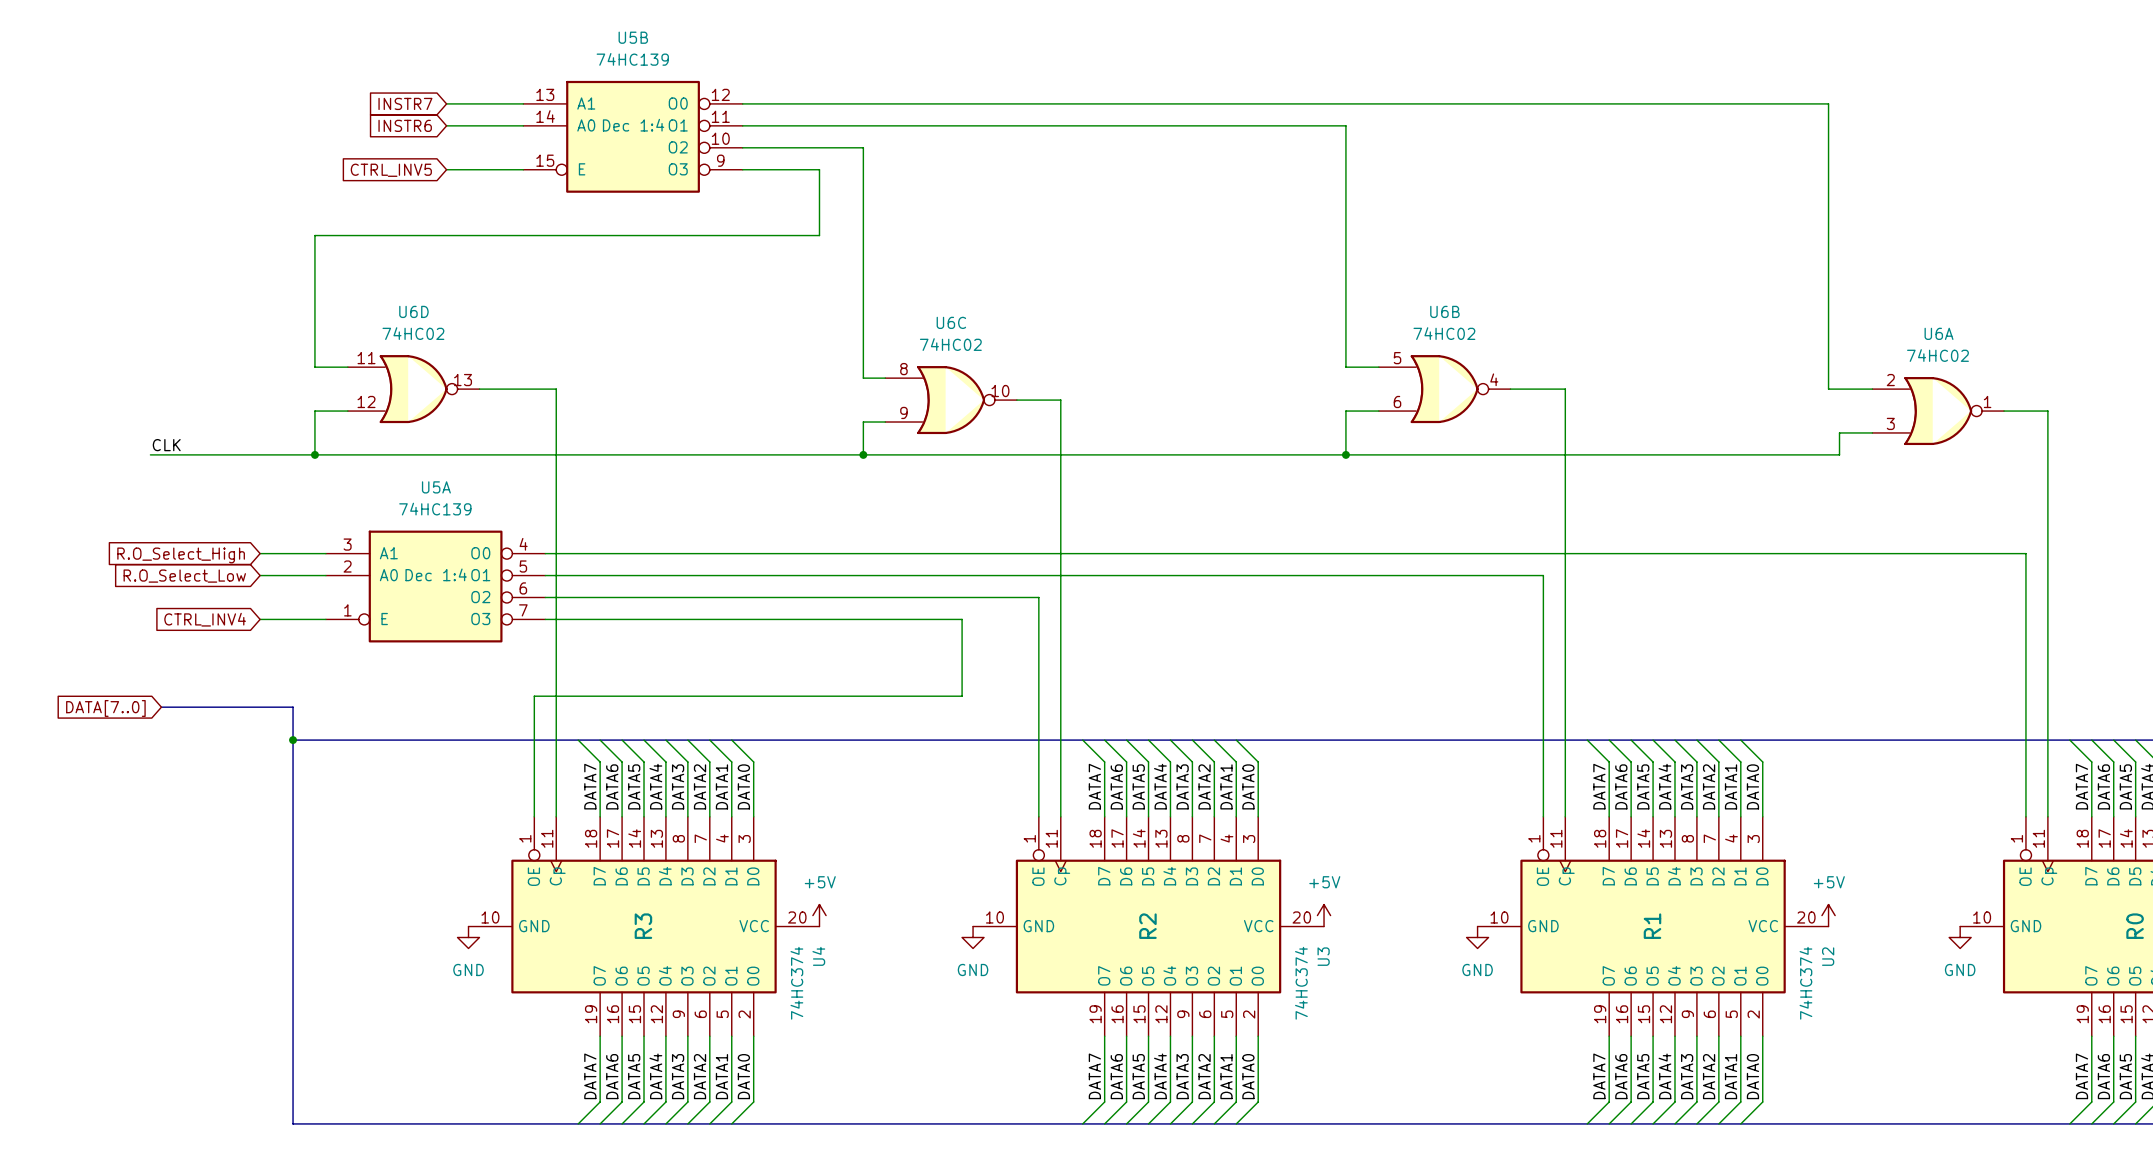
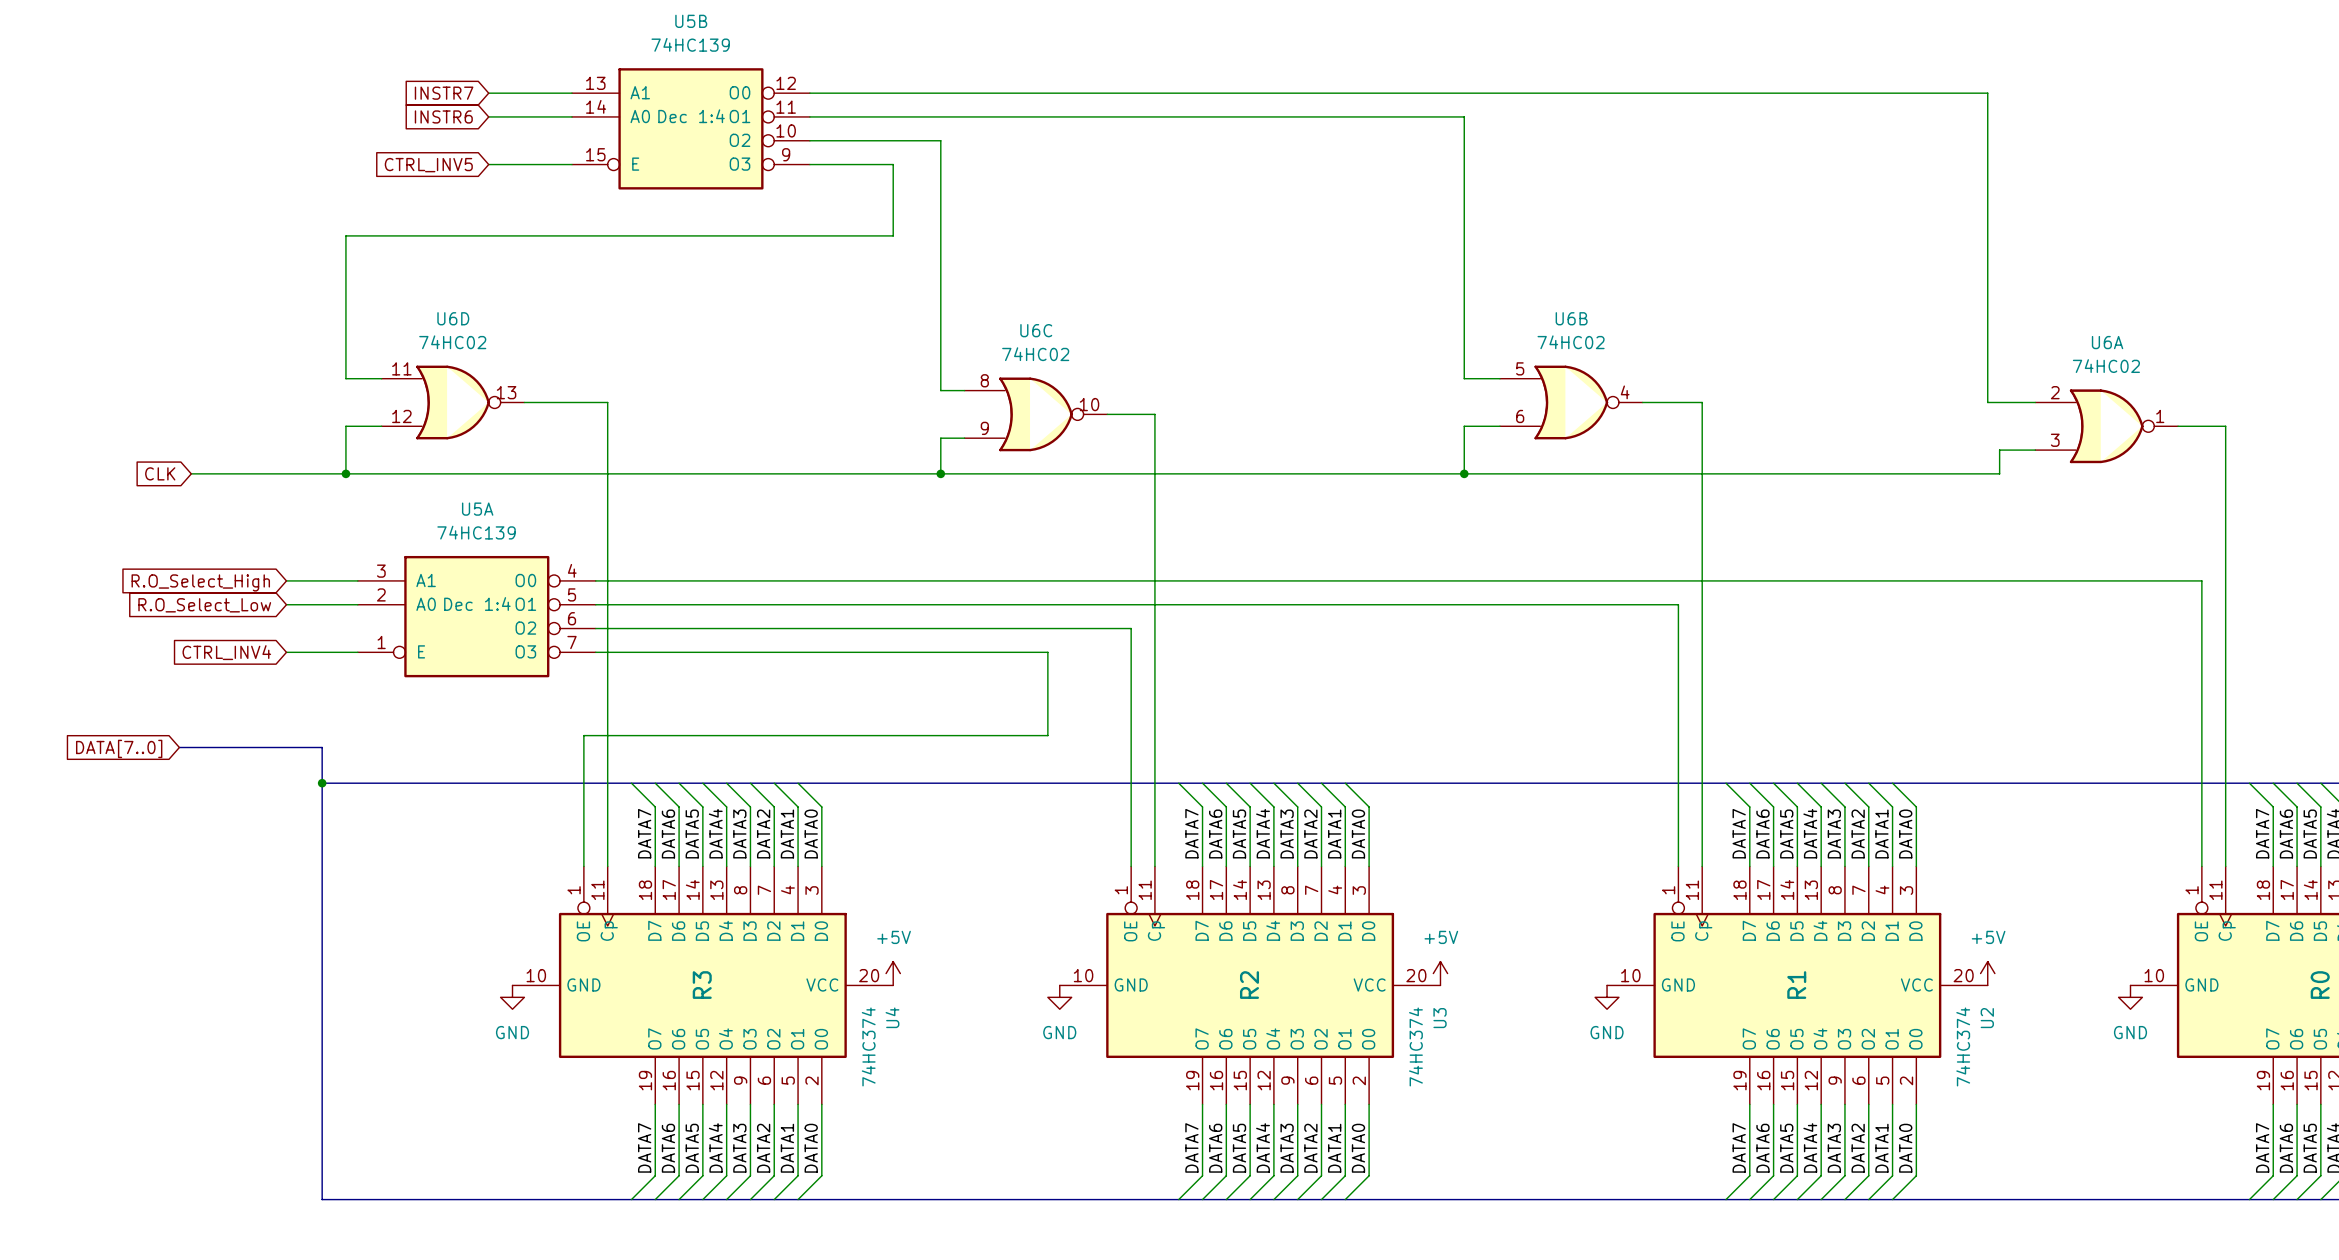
label: CLK (166, 445) -> none
global label: none -> CLK (160, 473)
wire: (150, 454) (172, 454) -> none

